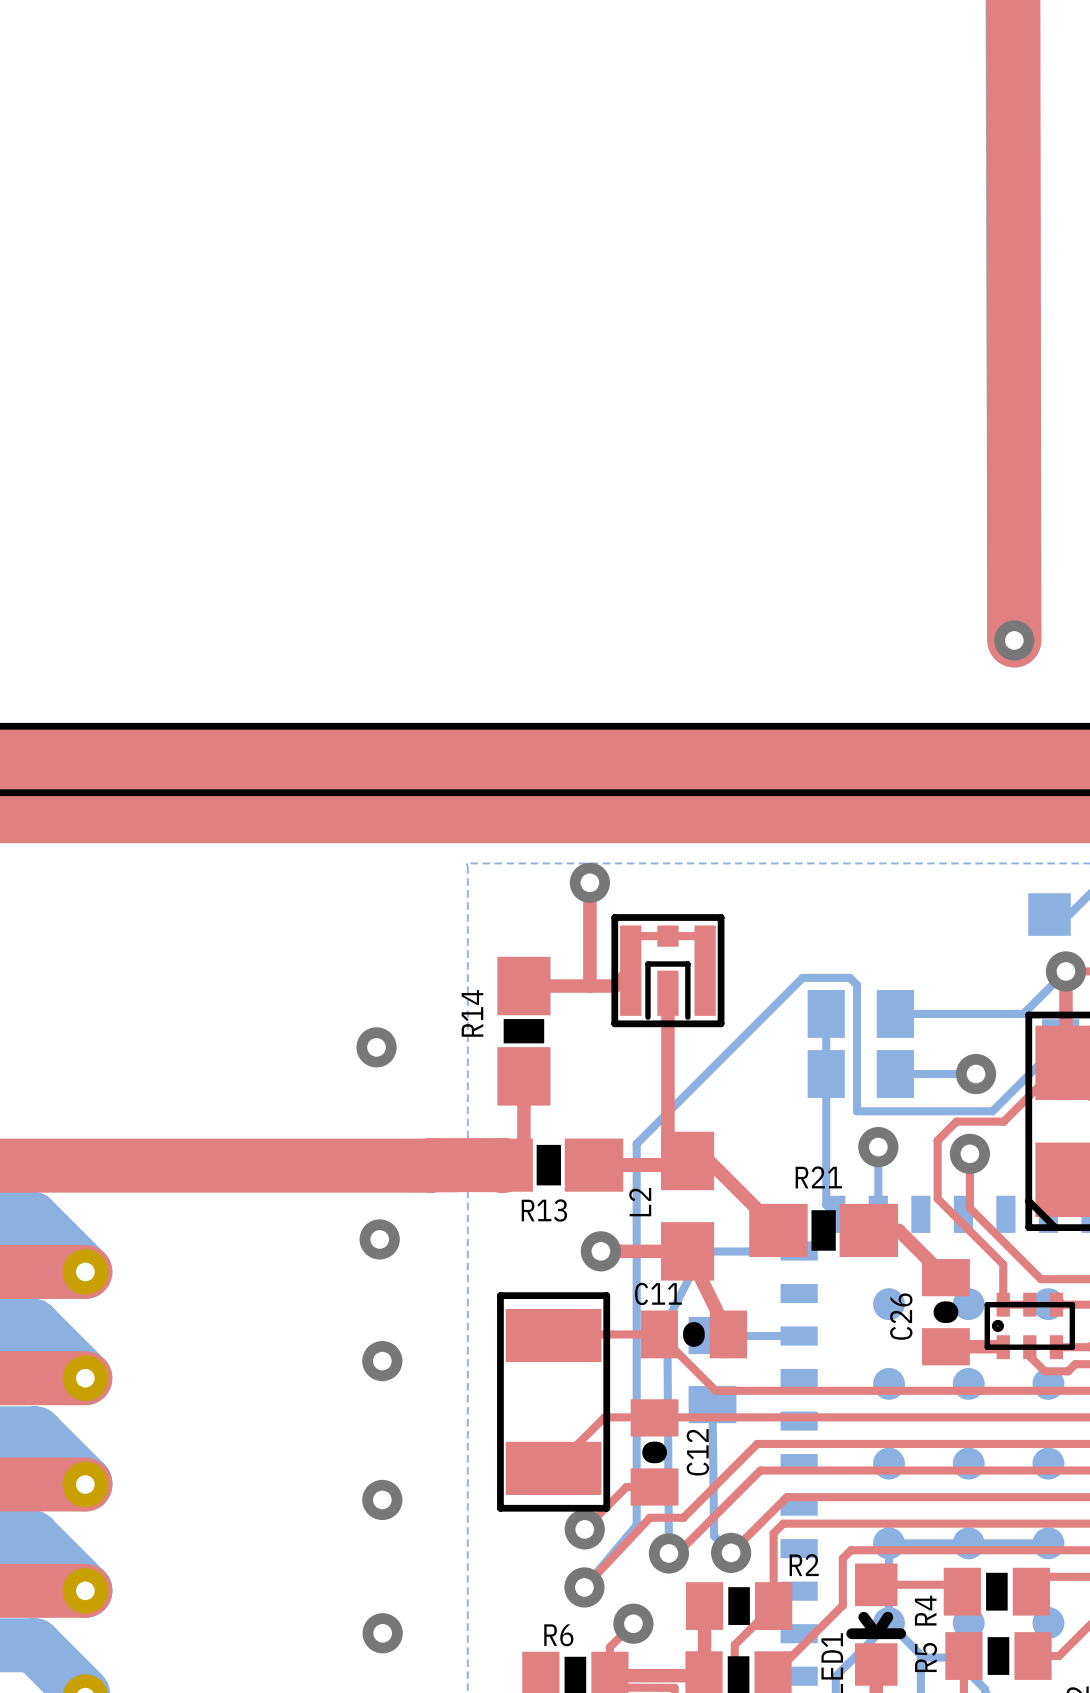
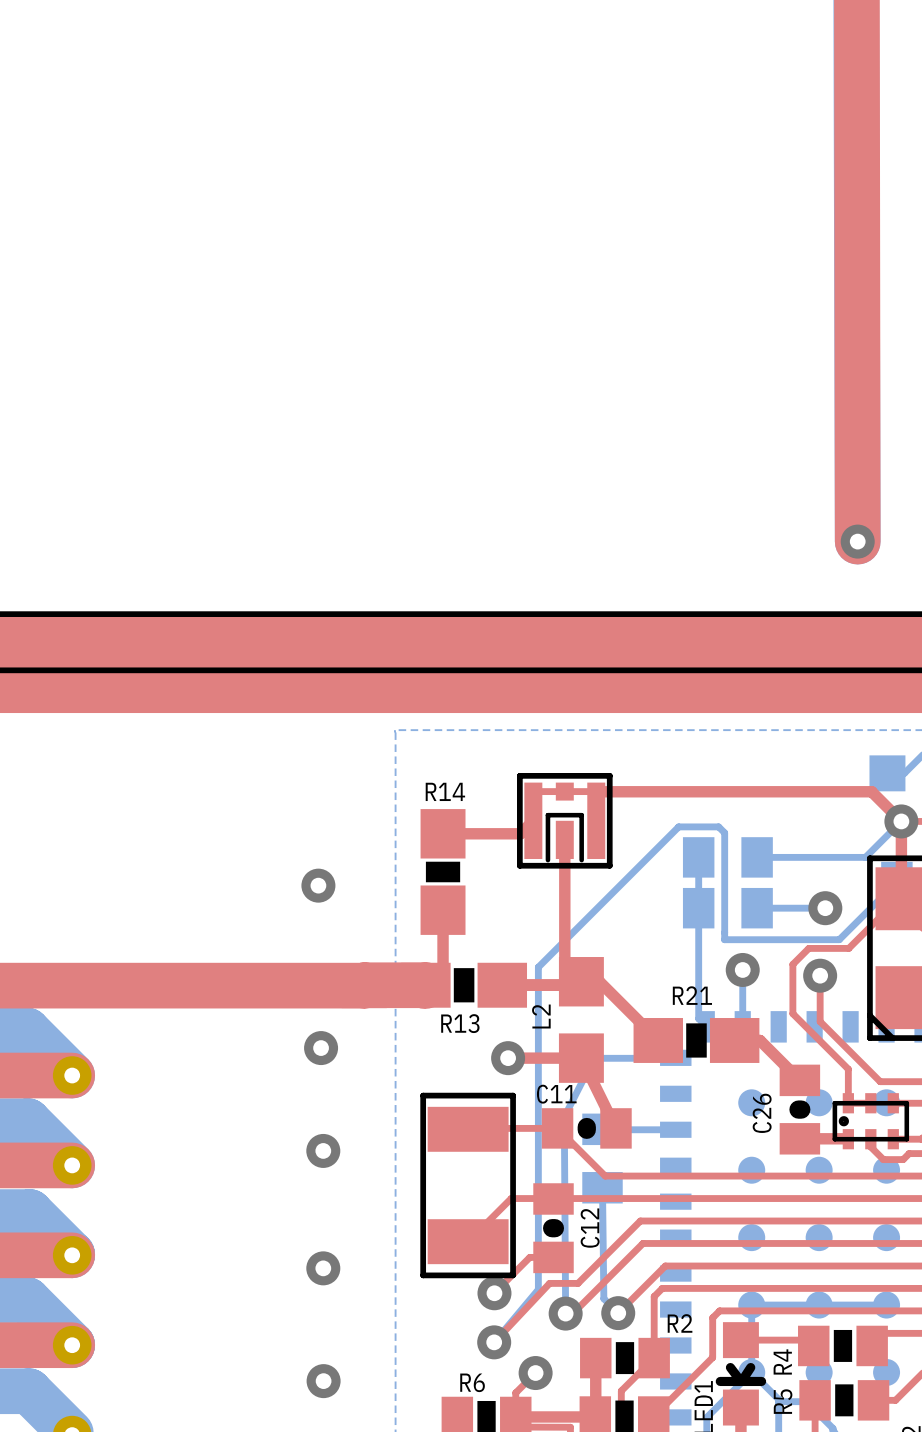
top track: (589, 882) (589, 986) -> none
via: (589, 882) -> none
top track: none -> (596, 791) (871, 791) (901, 821)
R14 name rotation: 0° (472, 1013) -> 90° clockwise (445, 791)
R14 name position: R14 (472, 1013) -> R14 (445, 791)

